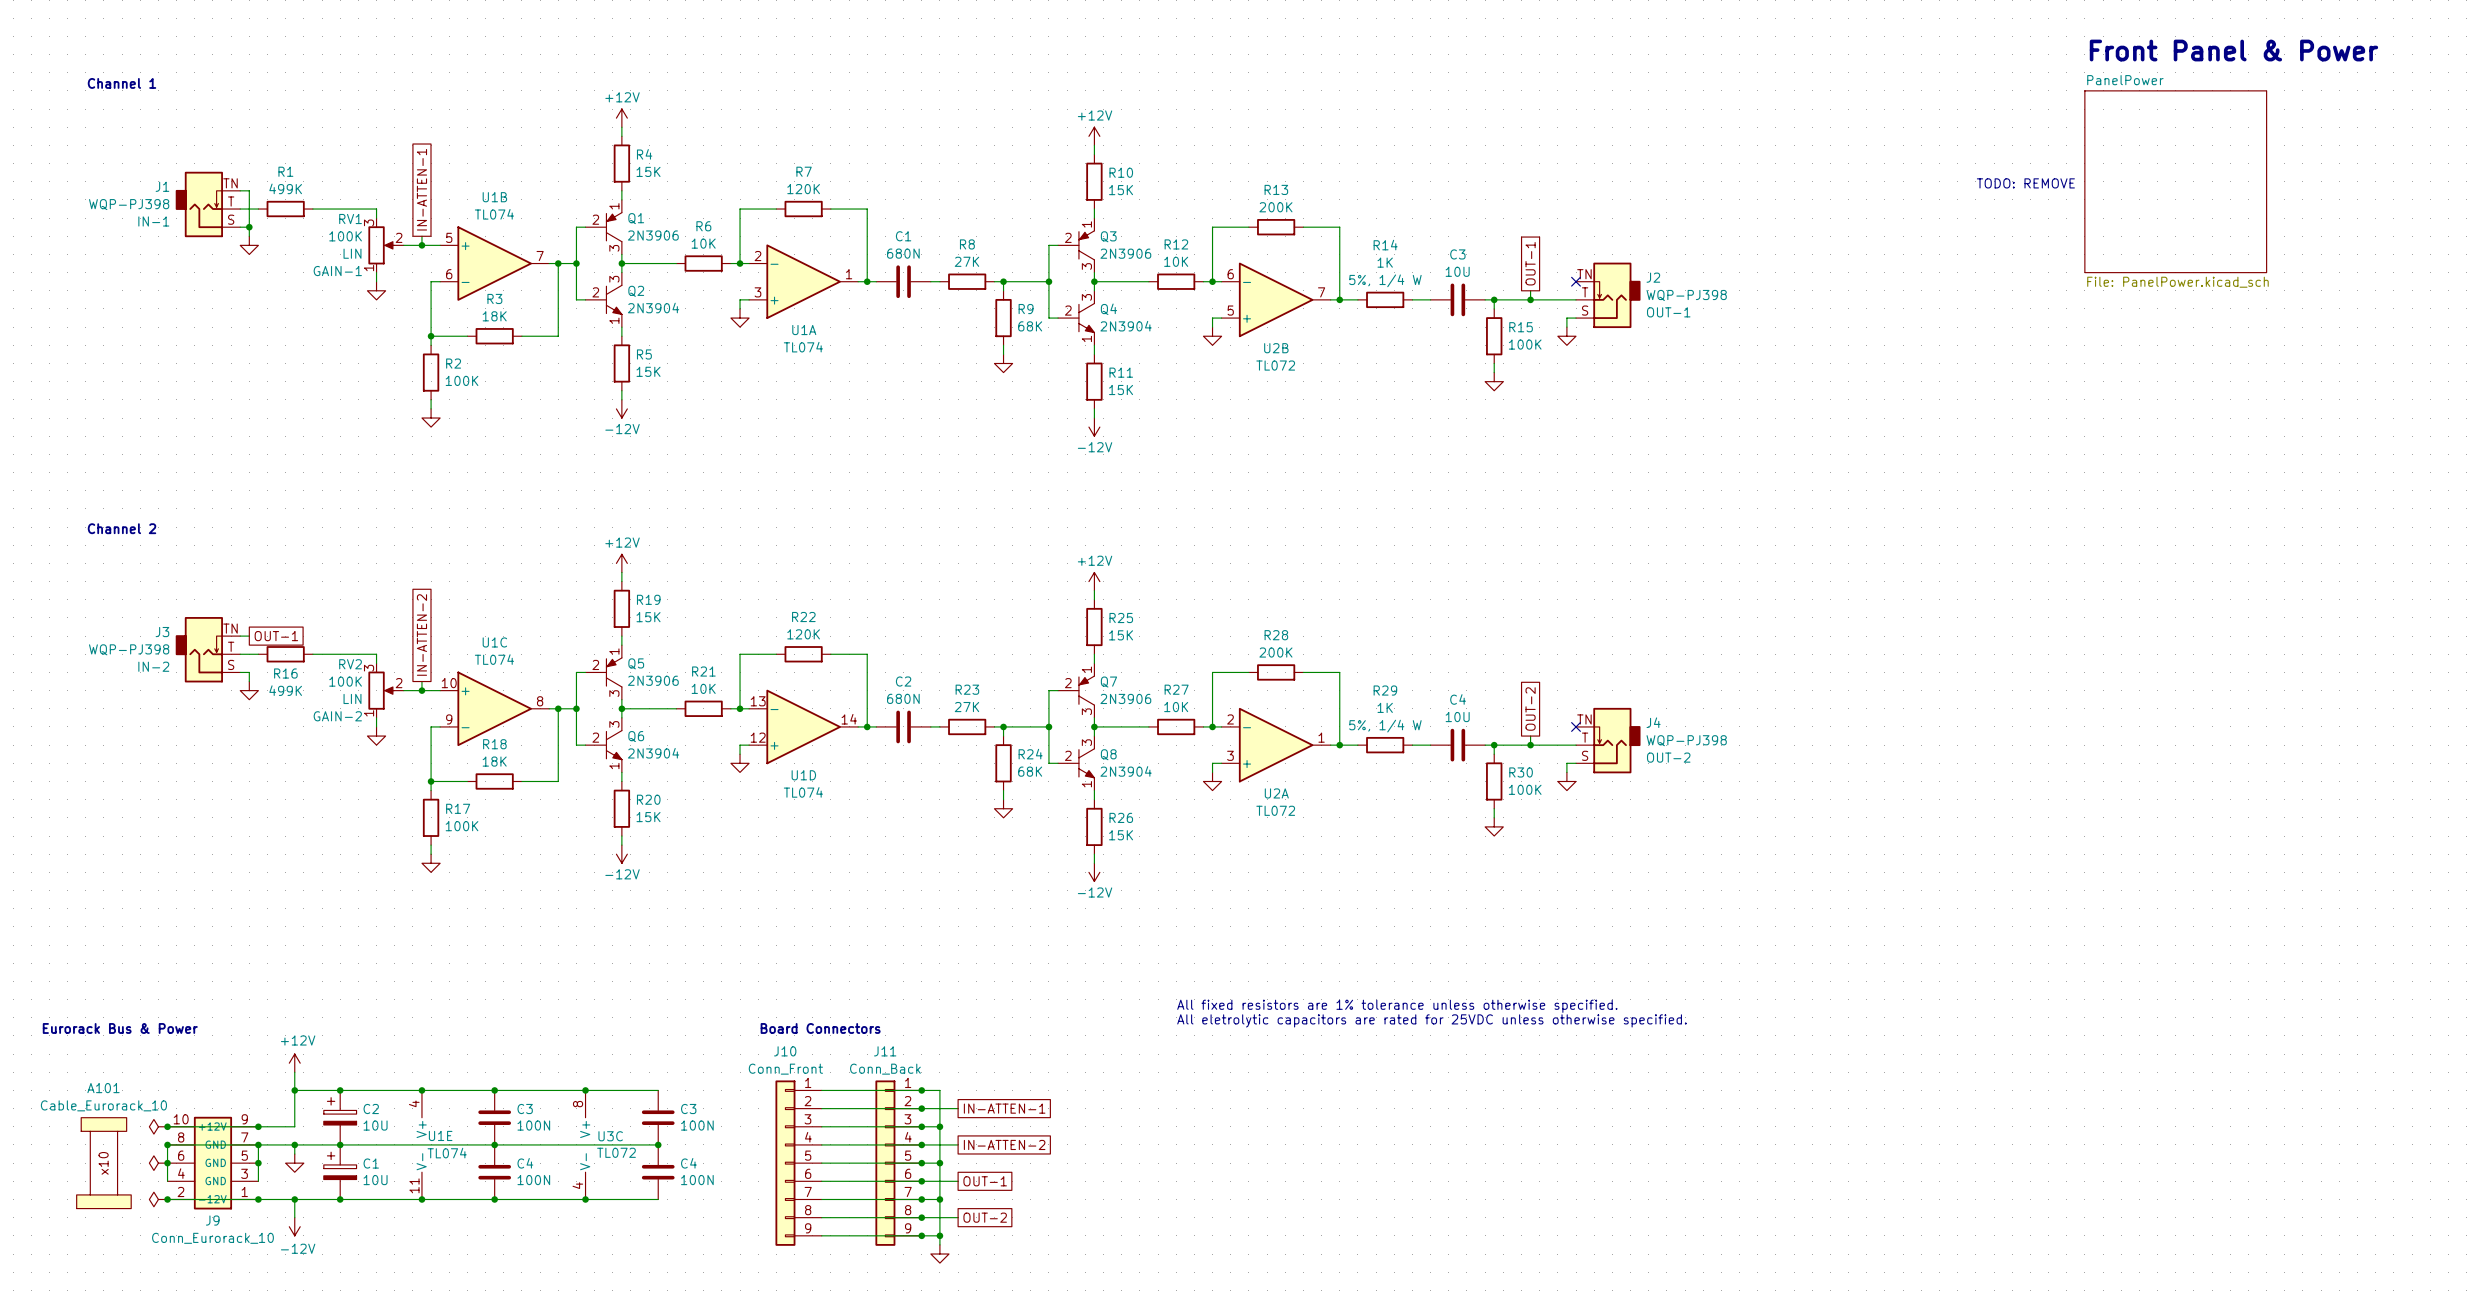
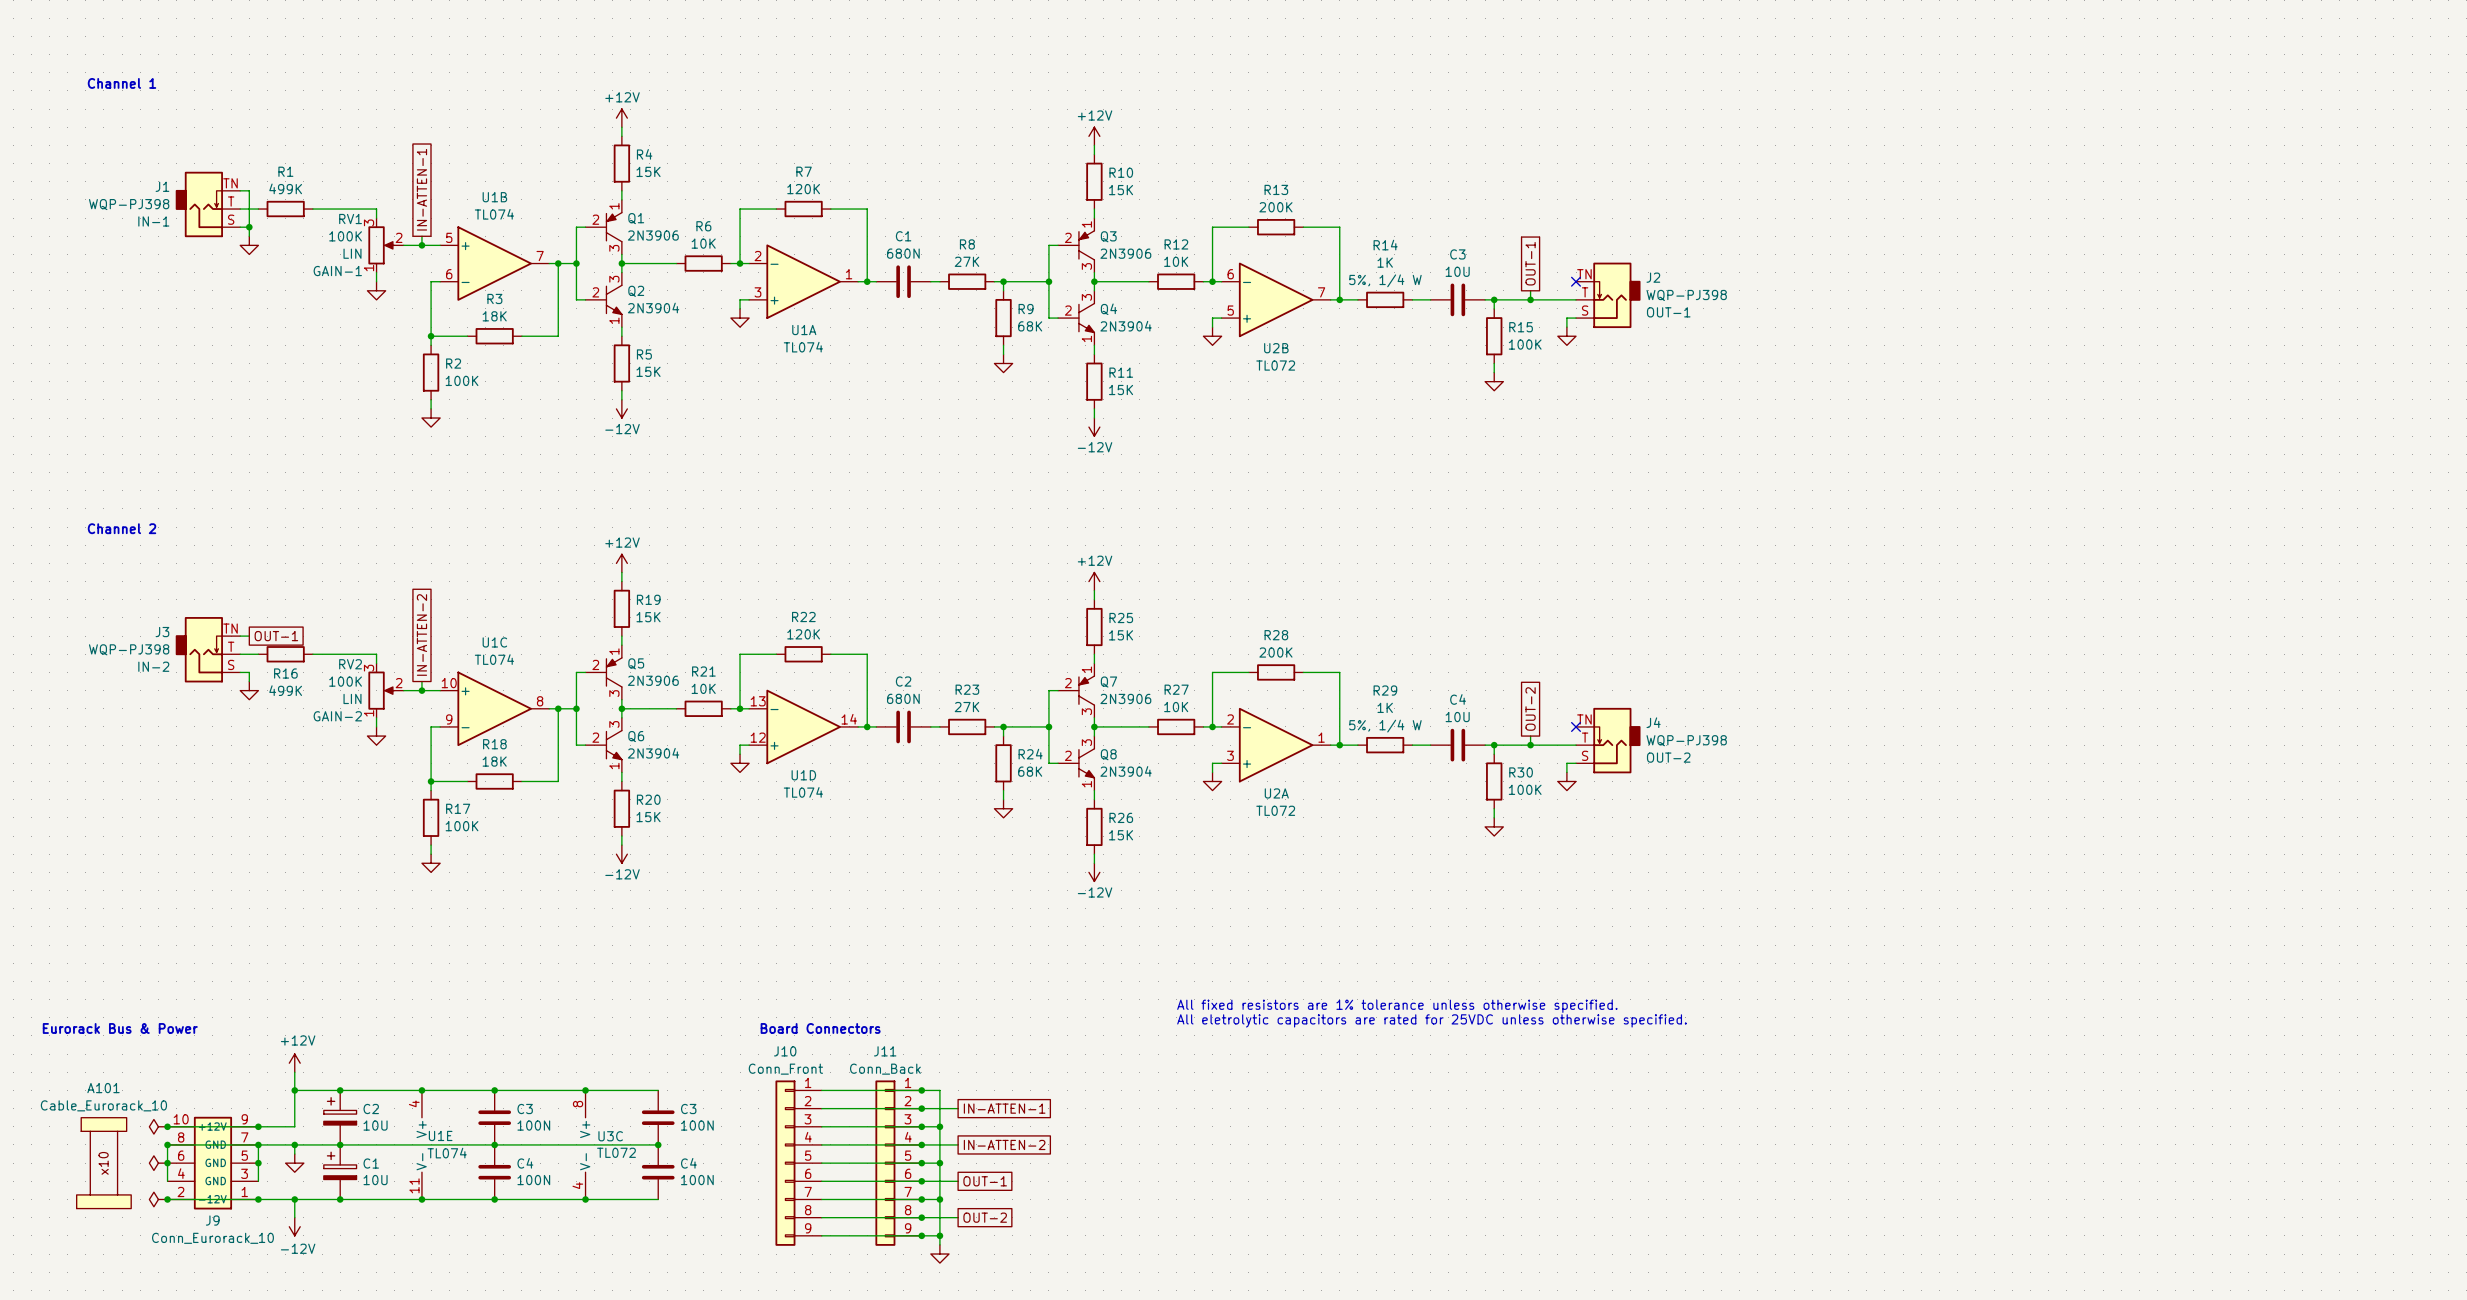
text: Front Panel & Power (2233, 50) -> none
sheet PanelPower: File: PanelPower.kicad_sch (2175, 181) -> none
text: TODO: REMOVE (2025, 183) -> none

